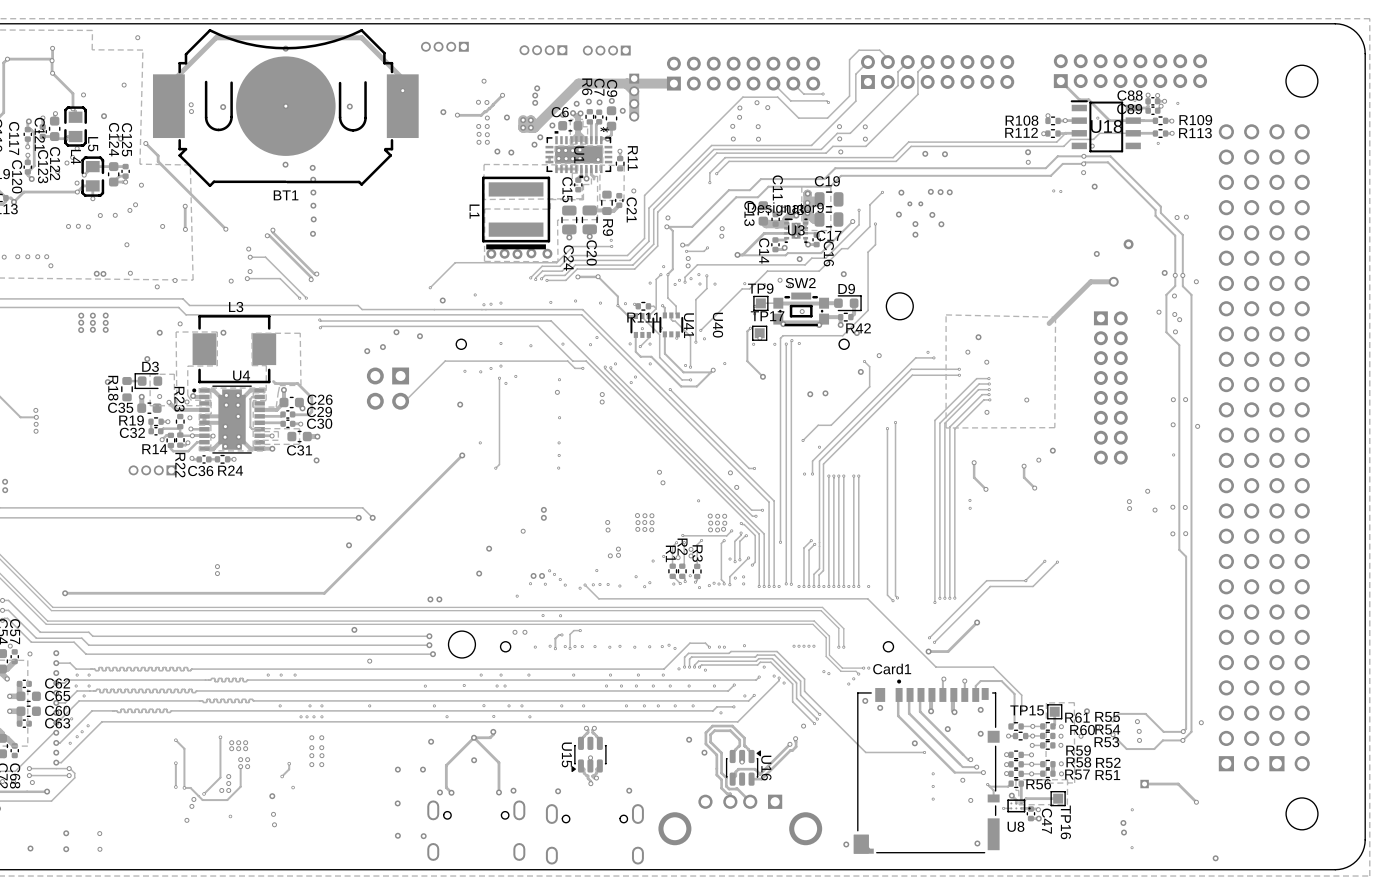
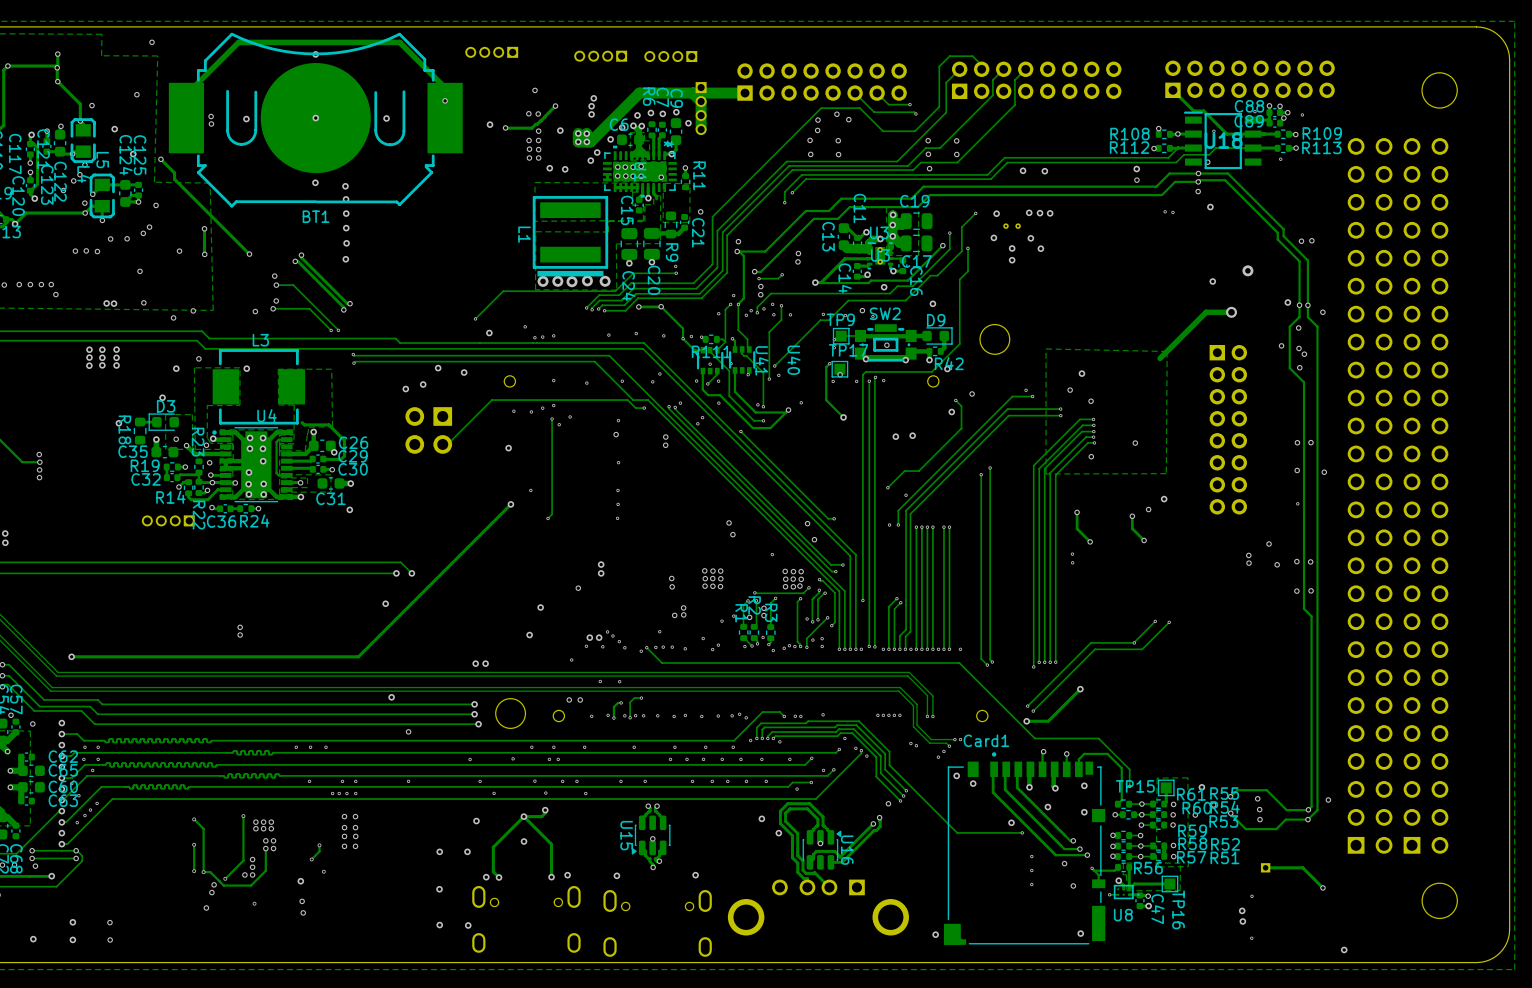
U3 text: Designator9 (785, 209) -> none

